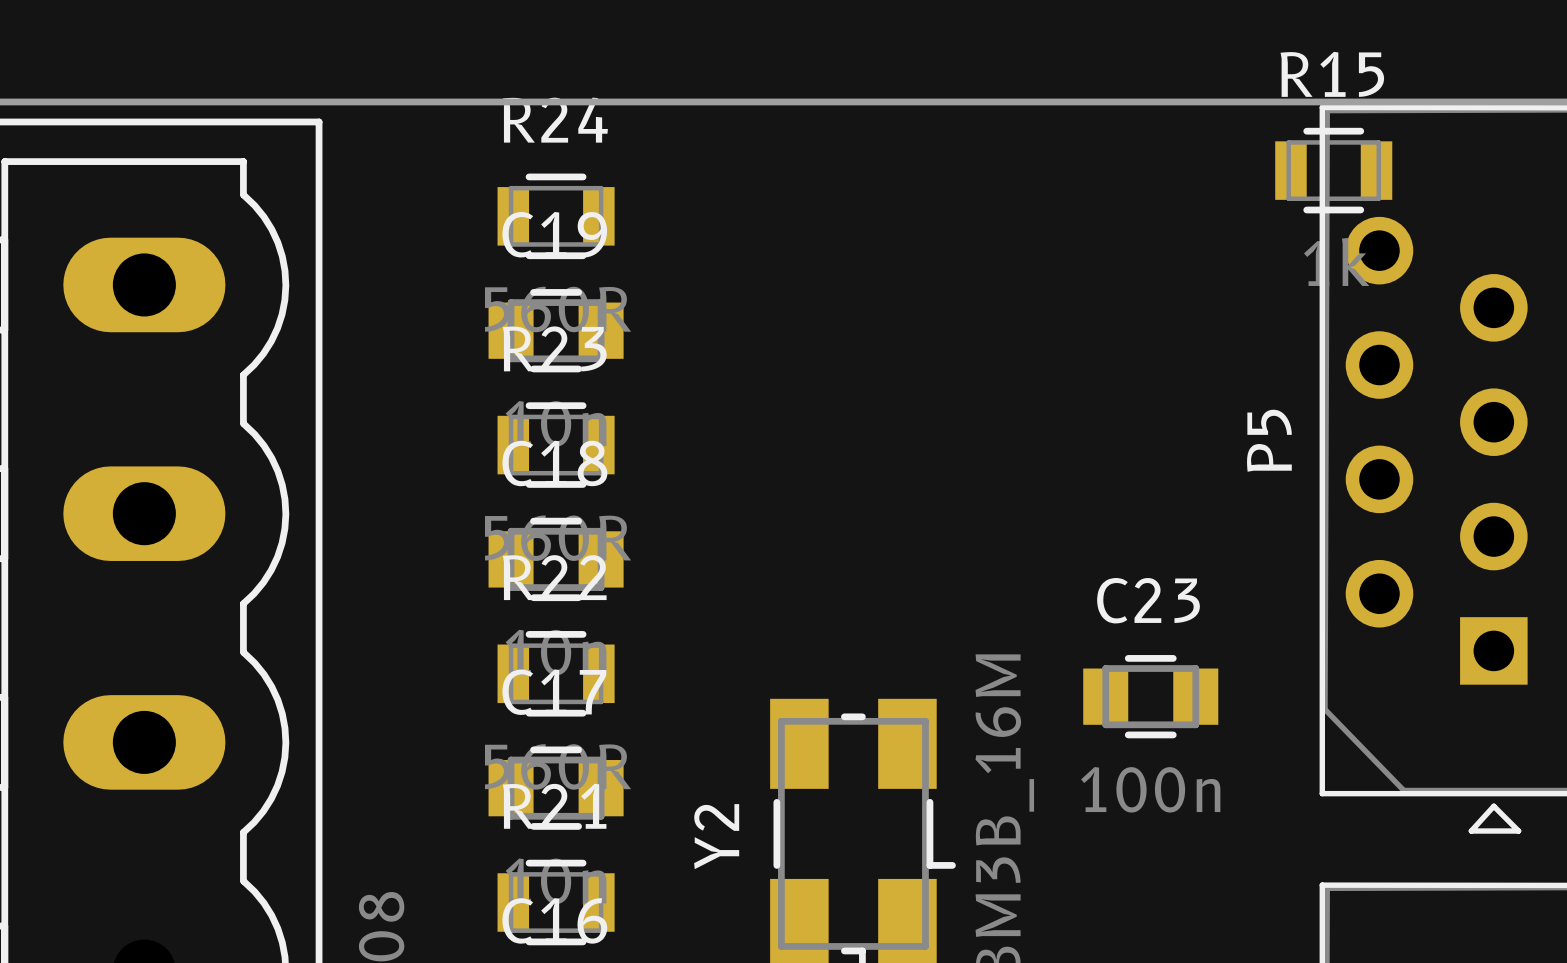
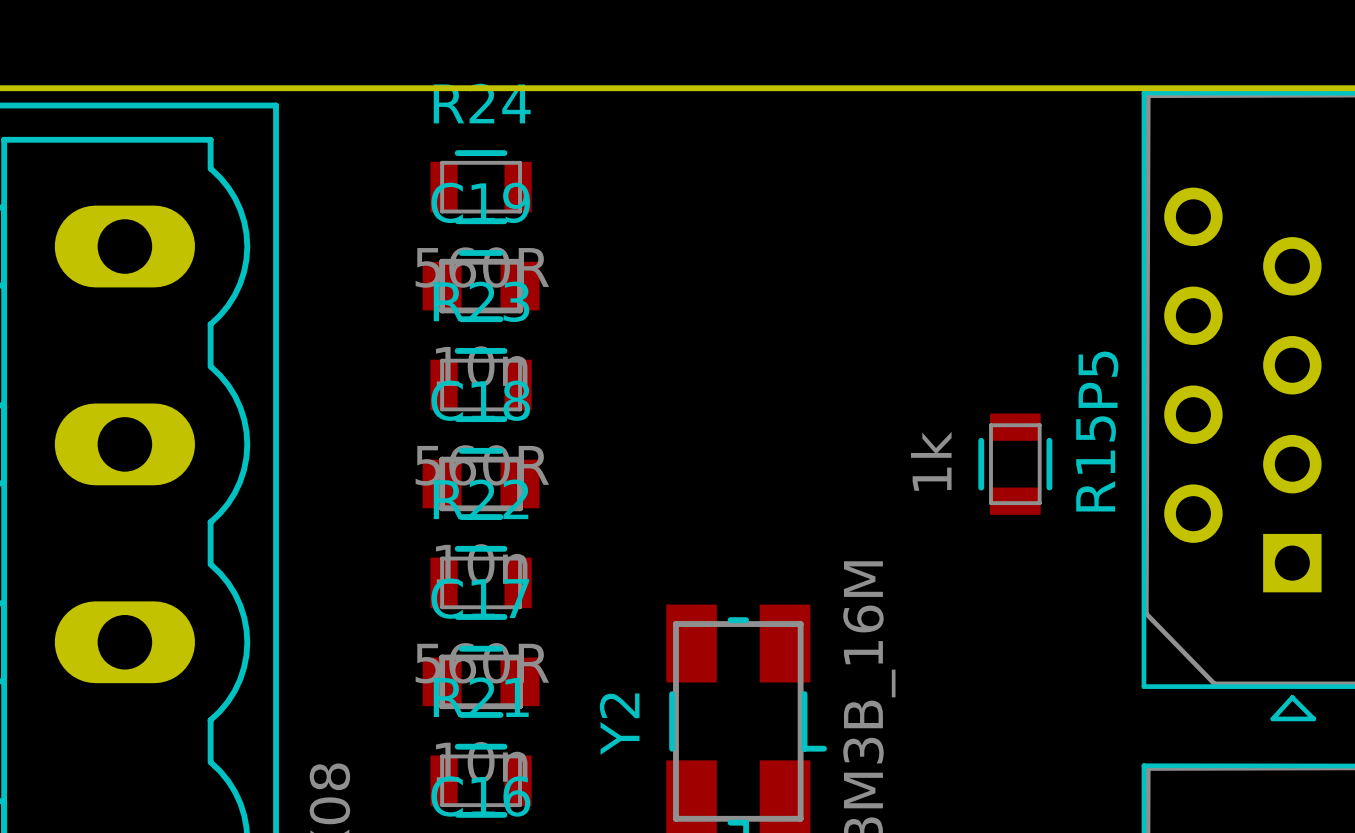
R15 rotation: 0° (1333, 170) -> 90° clockwise (1015, 464)
R15 position: (1333, 170) -> (1015, 464)
C23: 100n (1150, 696) -> none

